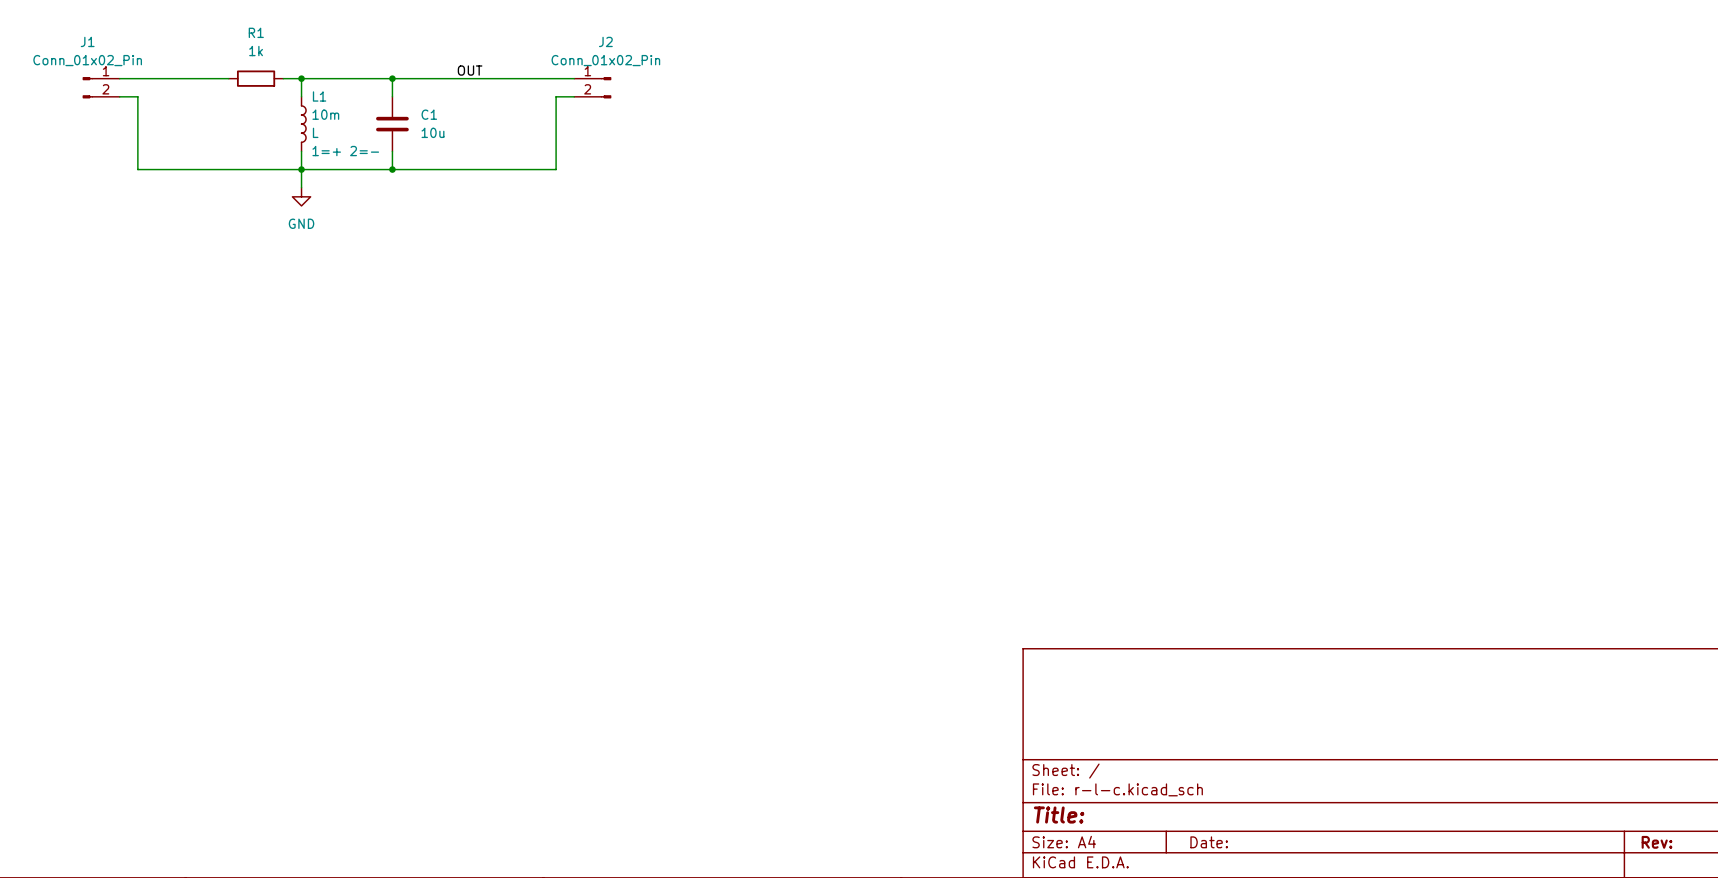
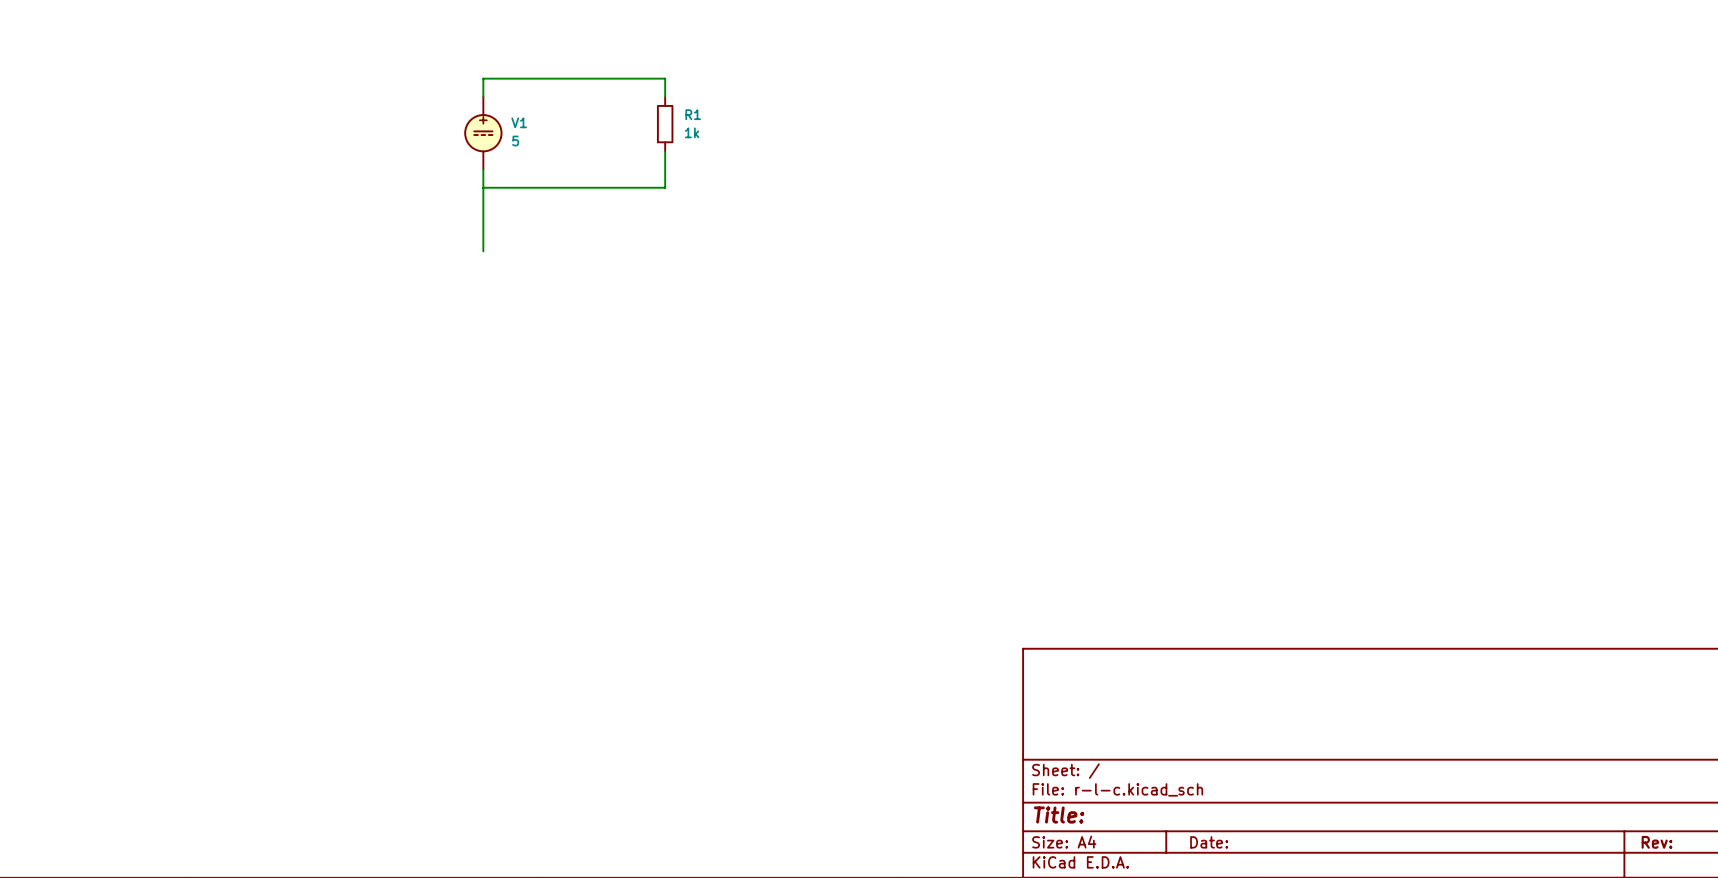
R1 name position: R1 (256, 32) -> R1 (693, 114)
label: OUT (470, 70) -> none
wire: (119, 78) (228, 78) -> none
R1 rotation: 0° (256, 78) -> 90° clockwise (665, 124)
R1 position: (256, 78) -> (665, 124)
wire: (283, 78) (483, 78) -> (483, 96) (483, 78)
wire: (301, 78) (301, 96) -> none
junction: (301, 78) -> none
wire: (392, 78) (392, 96) -> none
junction: (392, 78) -> none
wire: none -> (574, 78) (665, 78) (665, 96)
J1: Conn_01x02_Pin (101, 87) -> none
J2: Conn_01x02_Pin (592, 87) -> none
wire: (119, 96) (137, 96) (137, 169) (556, 169) (556, 96) (574, 96) -> none
L1: 10m (303, 124) -> none
C1: 10u (392, 124) -> none
V1: none -> 5 (483, 133)
wire: (301, 151) (301, 187) -> none
wire: (392, 151) (392, 169) -> none
wire: none -> (665, 151) (665, 187) (483, 187)
junction: (301, 169) -> none
junction: (392, 169) -> none
wire: none -> (483, 169) (483, 251)
power symbol: GND (301, 196) -> none

